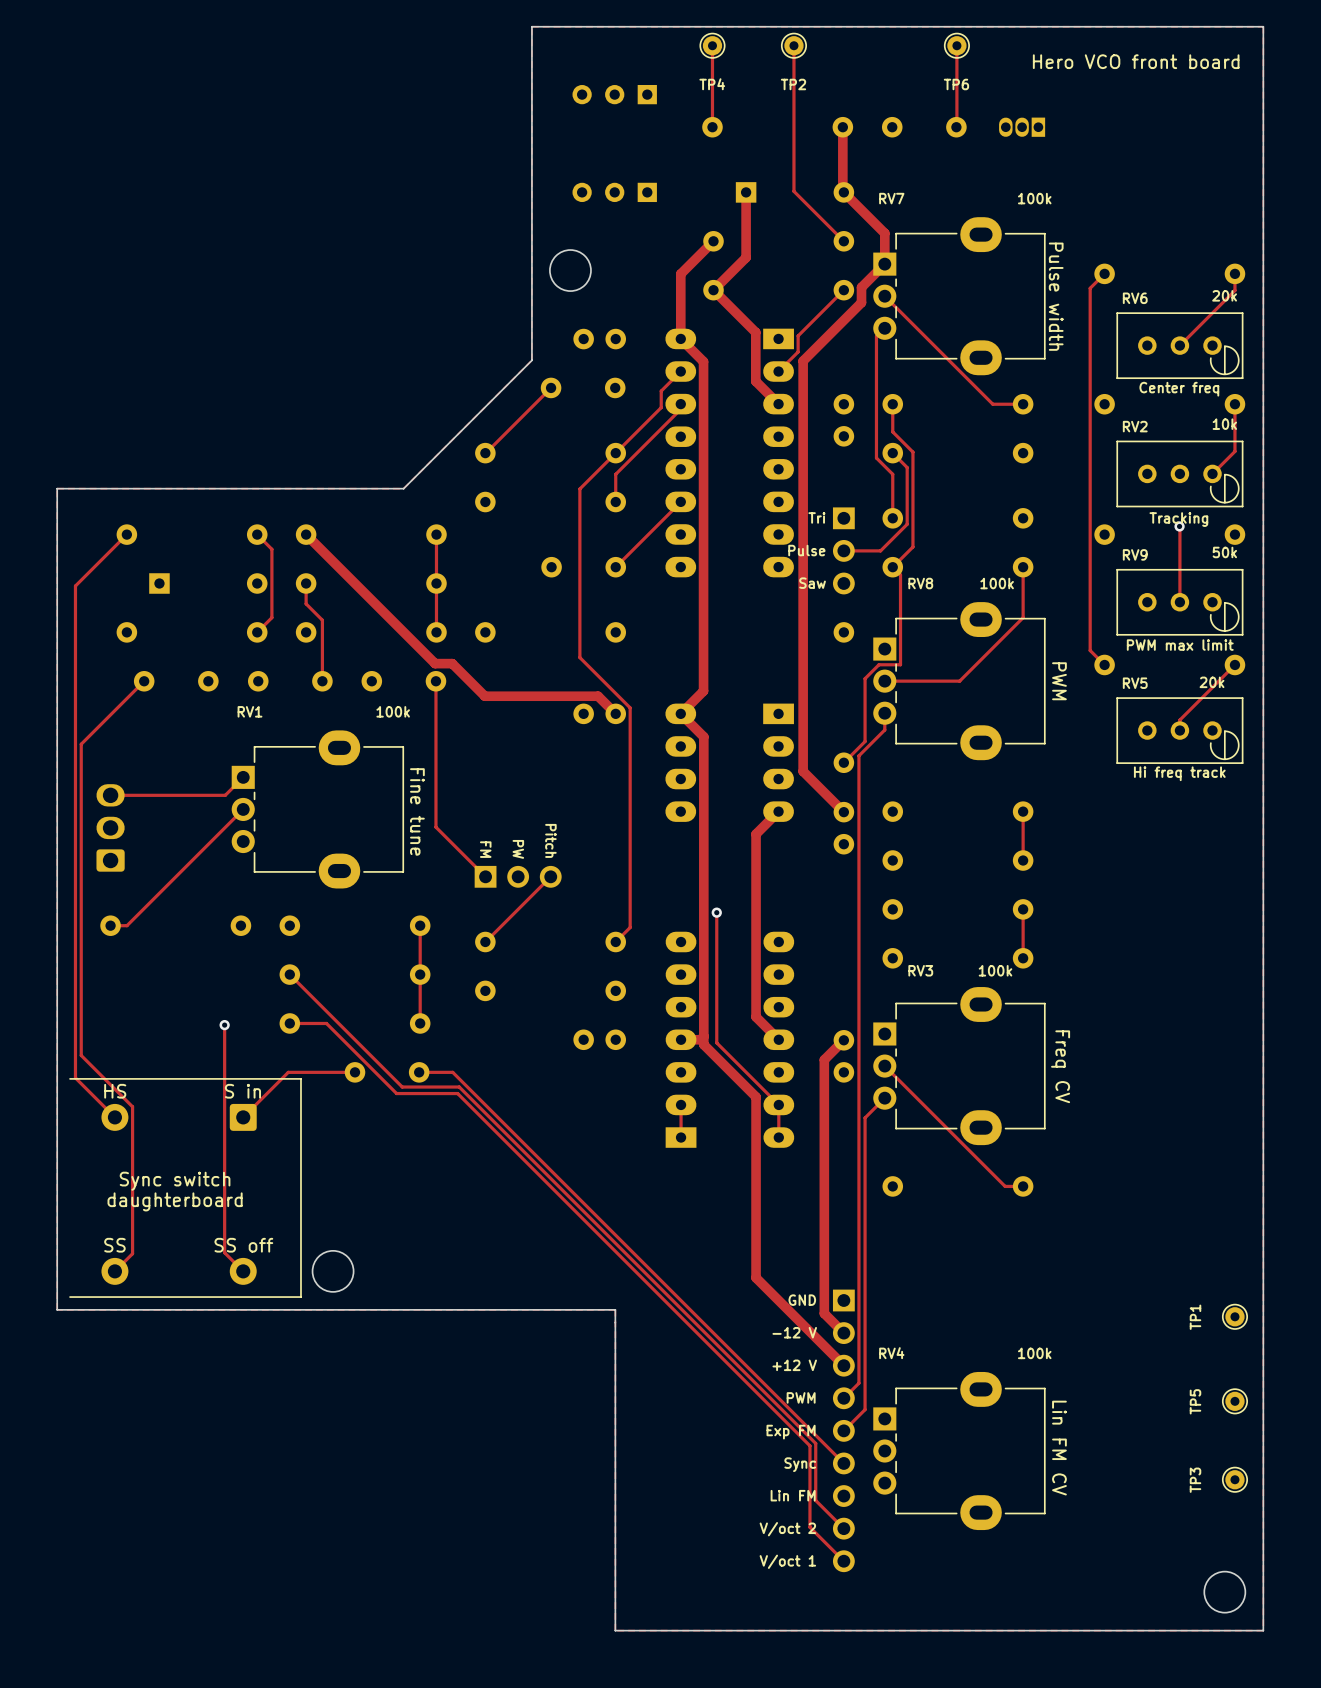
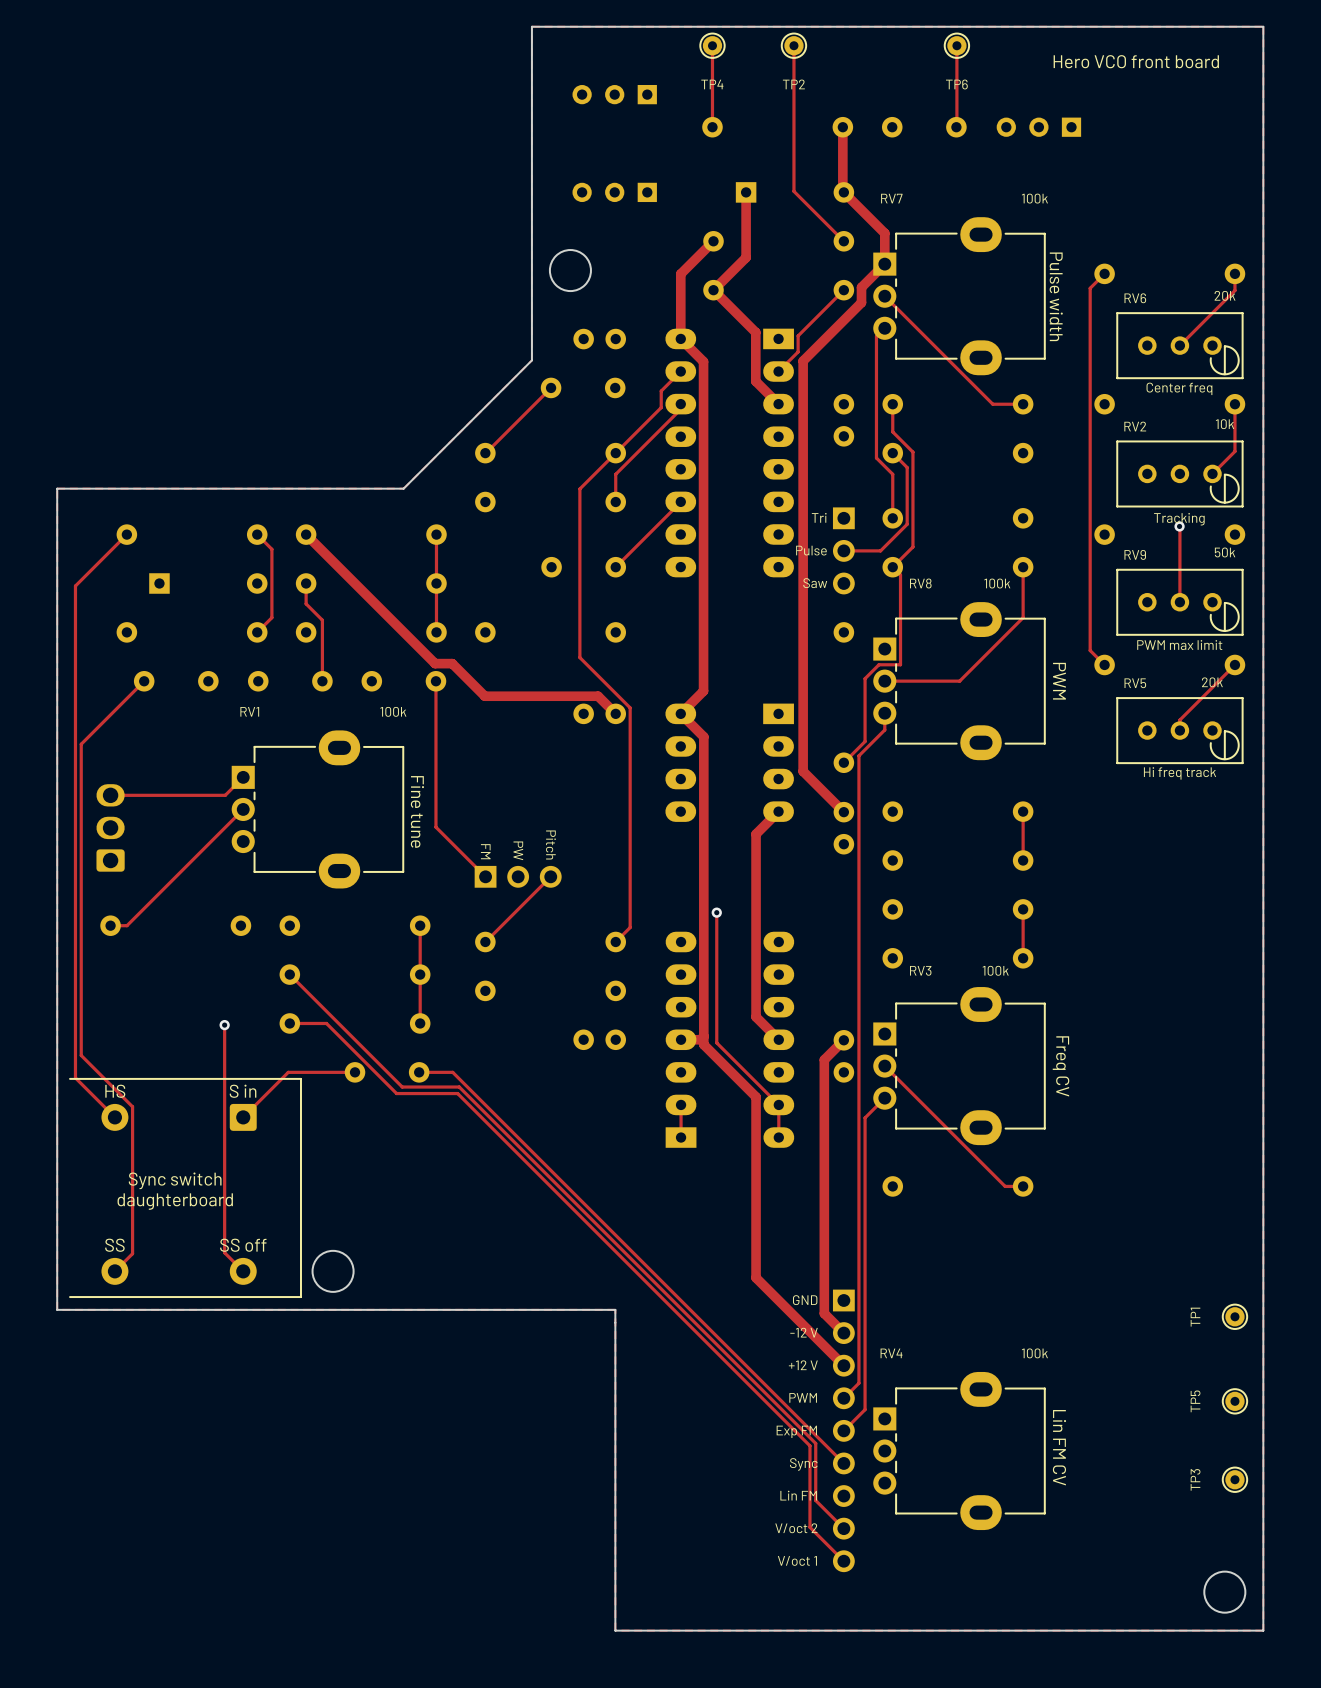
part: (1022, 127) -> none
part: none -> (1038, 127)

